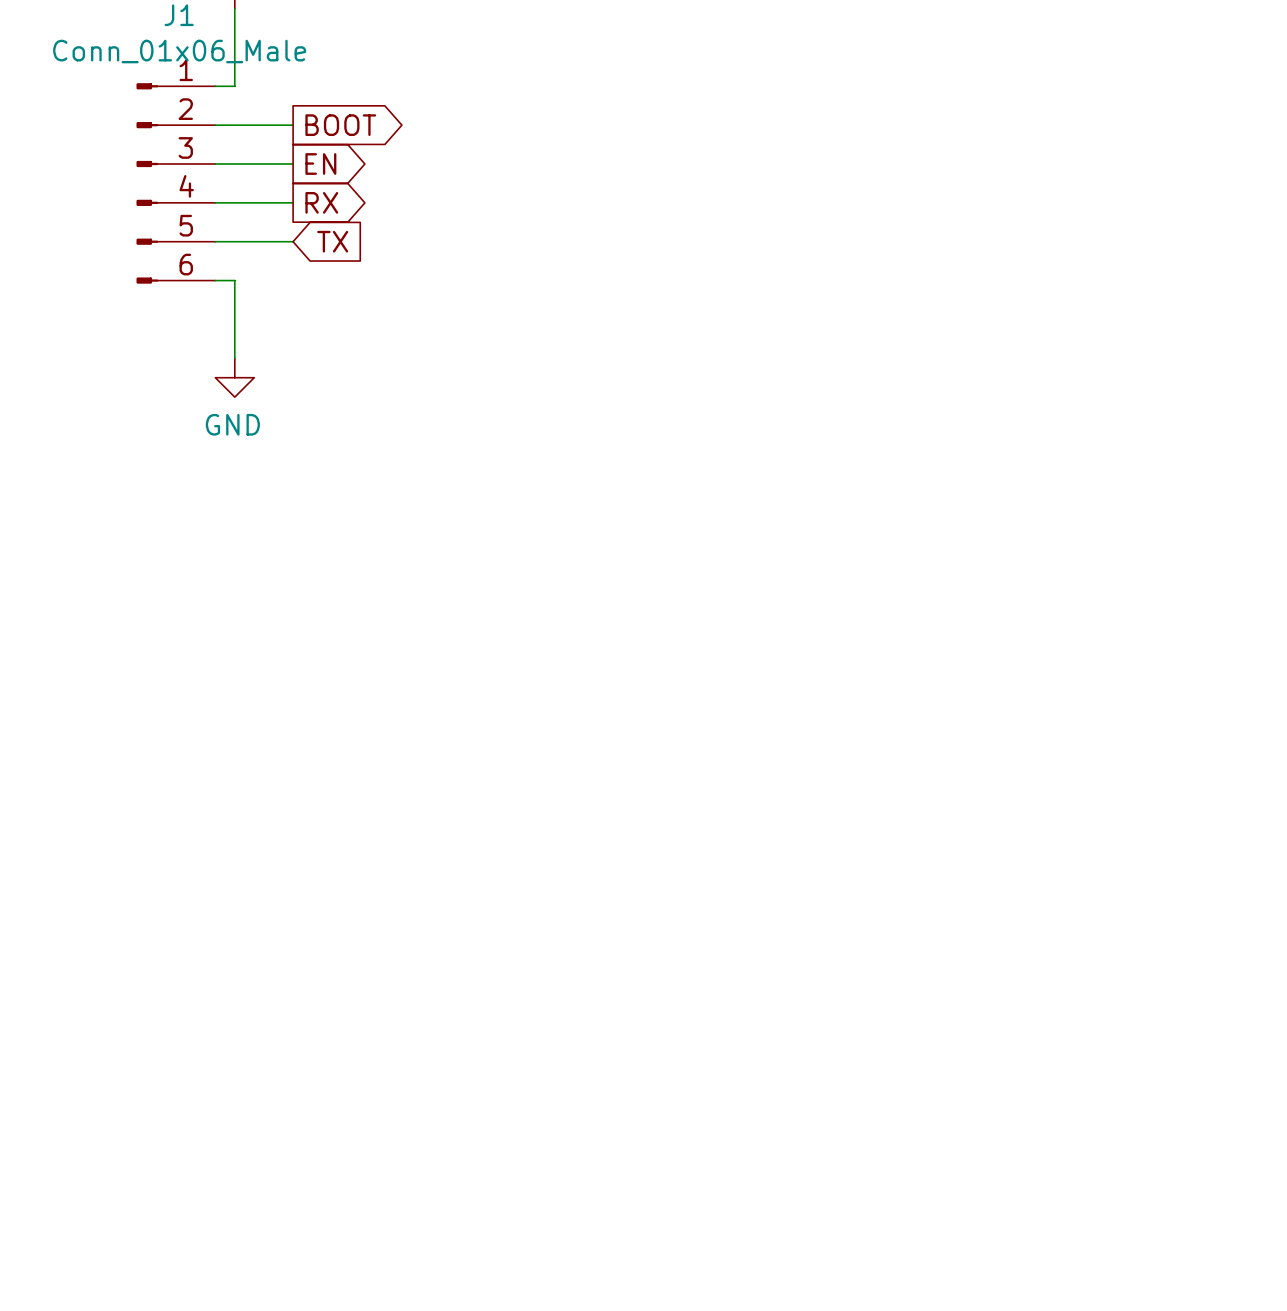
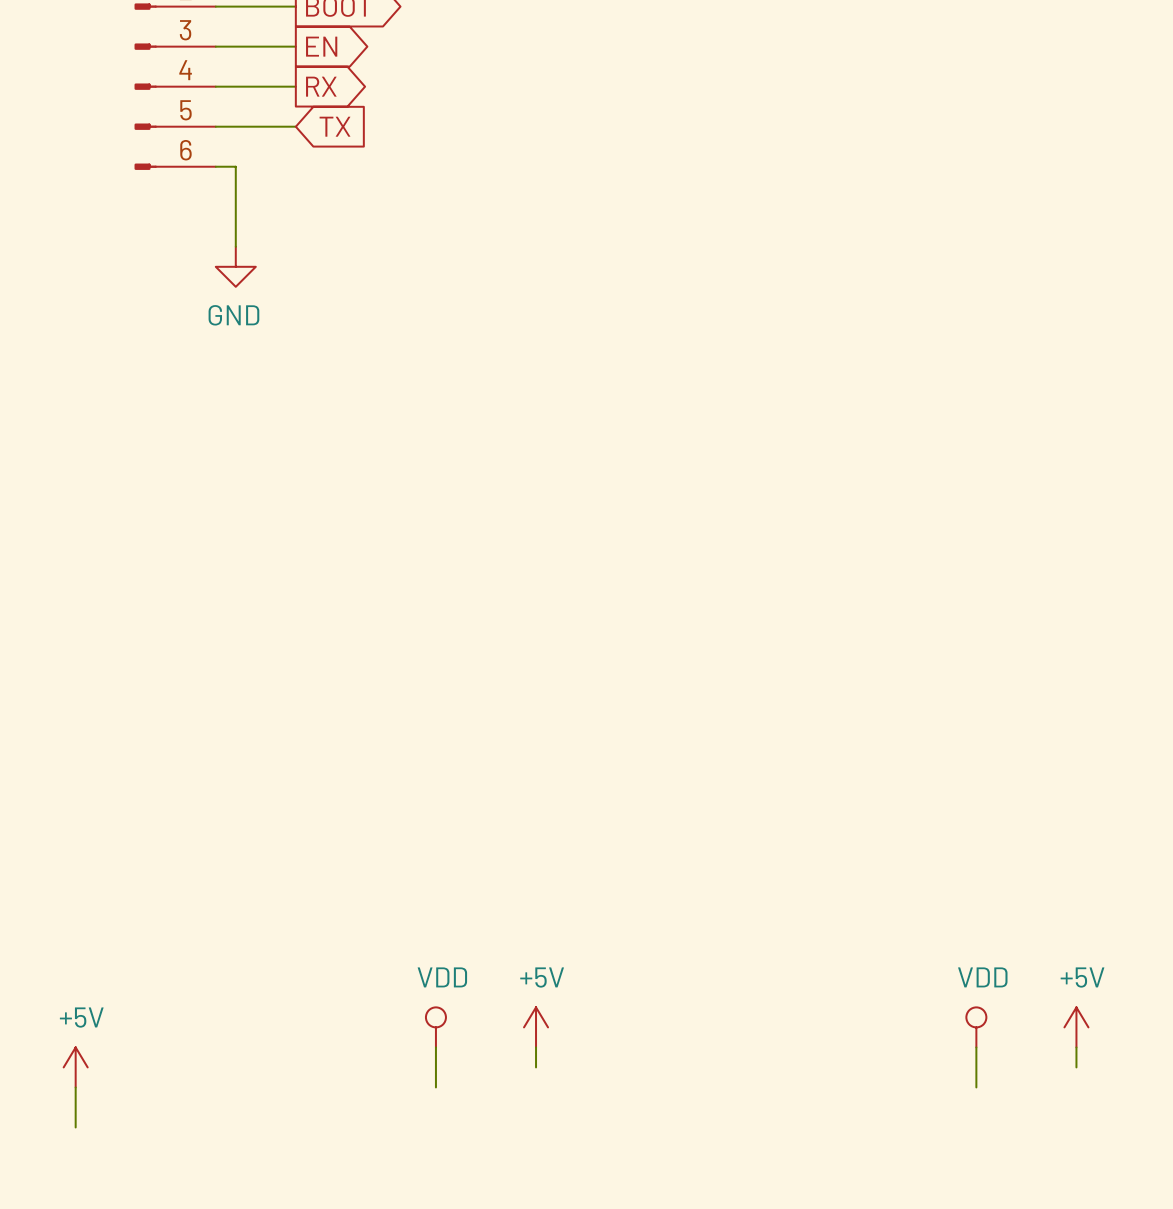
power symbol: none -> VDD (435, 1027)
power symbol: none -> +5V (536, 1027)
power symbol: none -> VDD (976, 1027)
power symbol: none -> +5V (1076, 1027)
wire: none -> (435, 1047) (435, 1087)
wire: none -> (536, 1047) (536, 1067)
wire: none -> (976, 1047) (976, 1087)
wire: none -> (1076, 1047) (1076, 1067)
power symbol: none -> +5V (75, 1067)
wire: none -> (75, 1087) (75, 1127)

